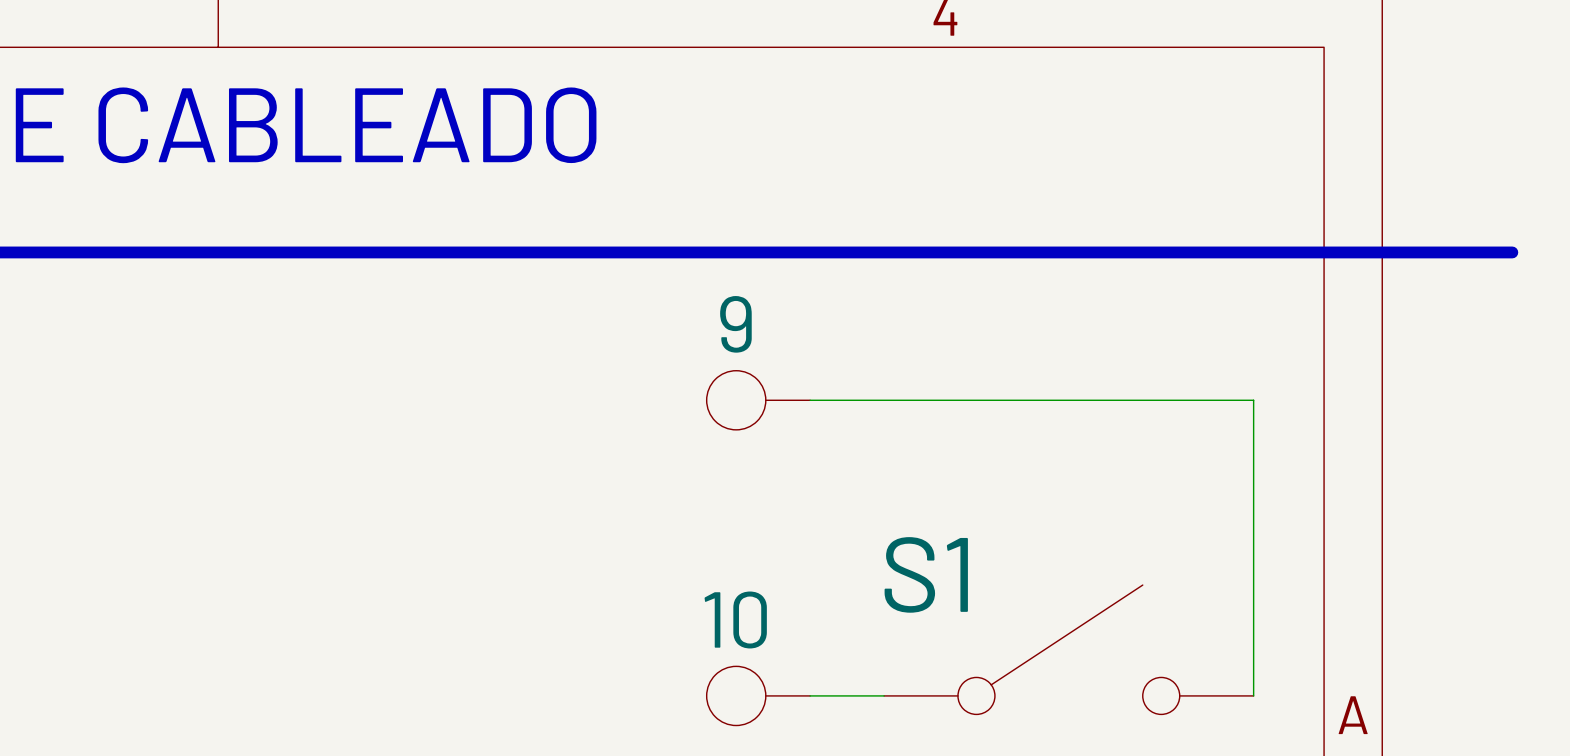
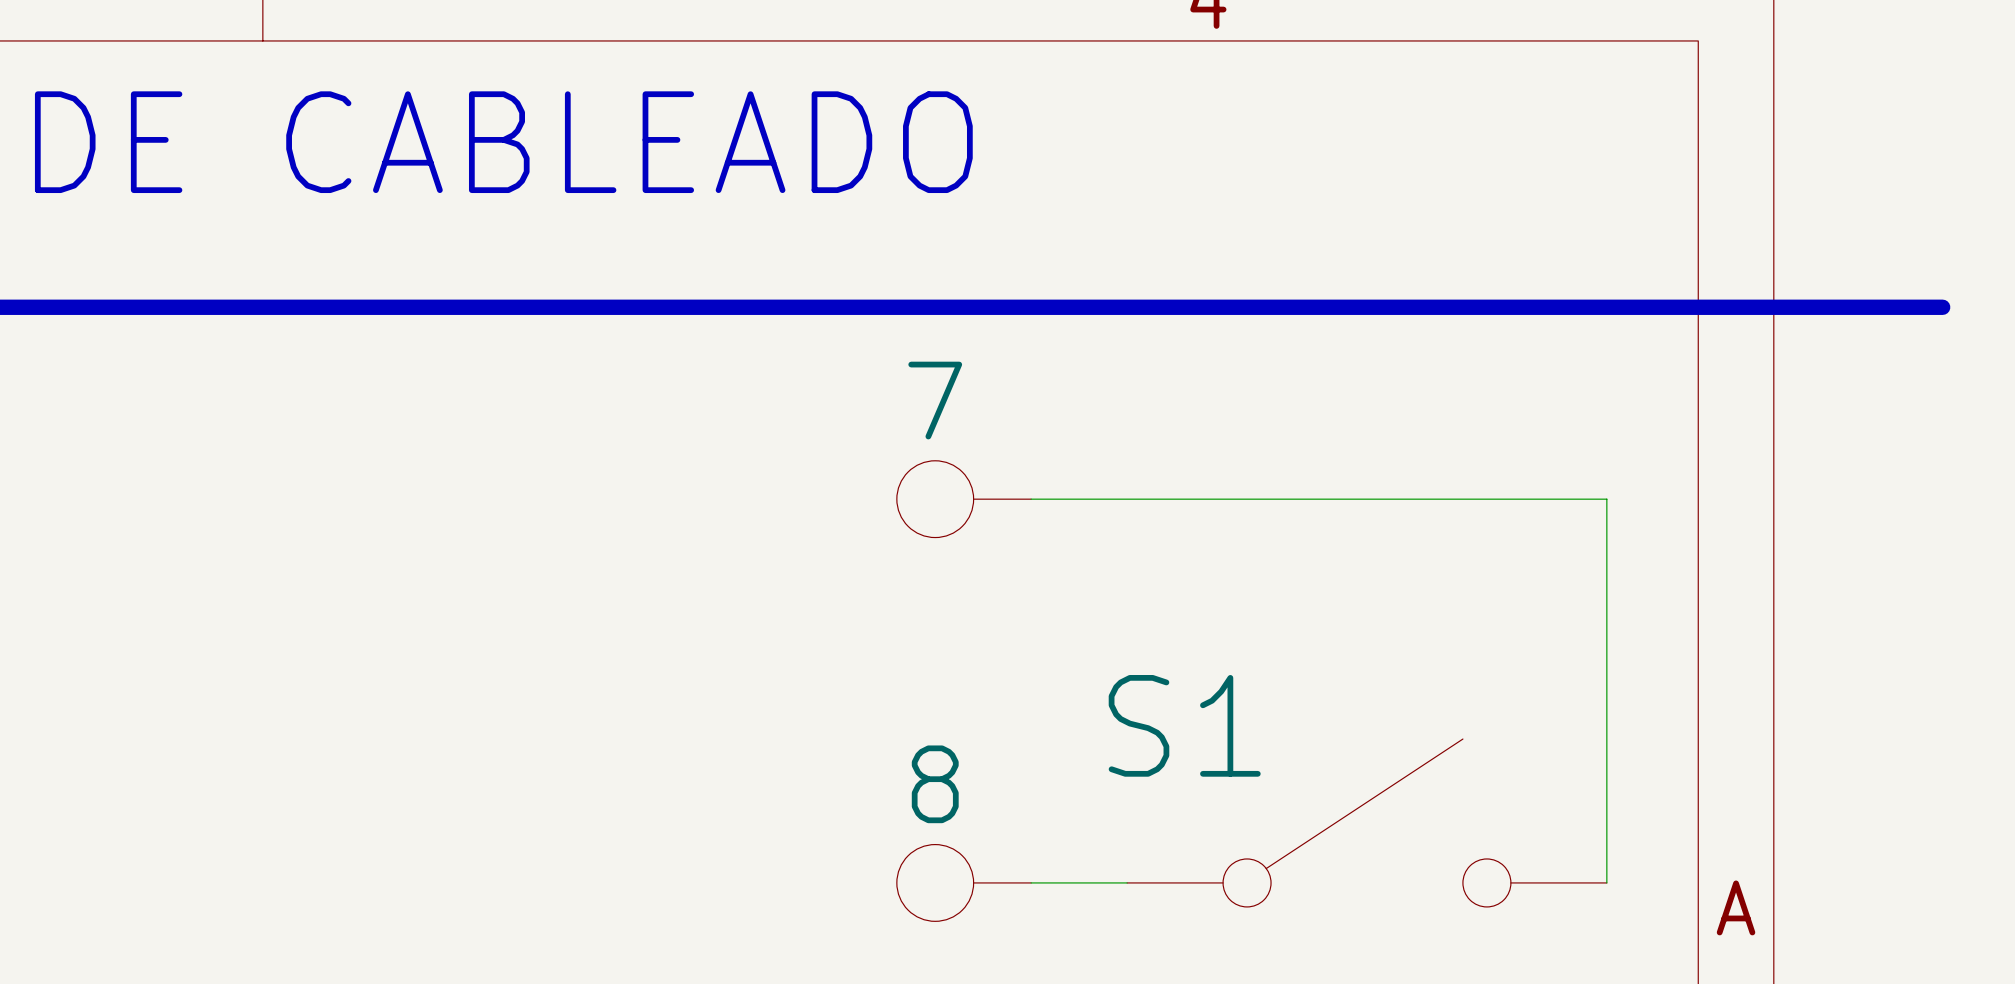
part value: 9 (735, 324) -> 7 (935, 400)
part value: 10 (735, 619) -> 8 (935, 784)

